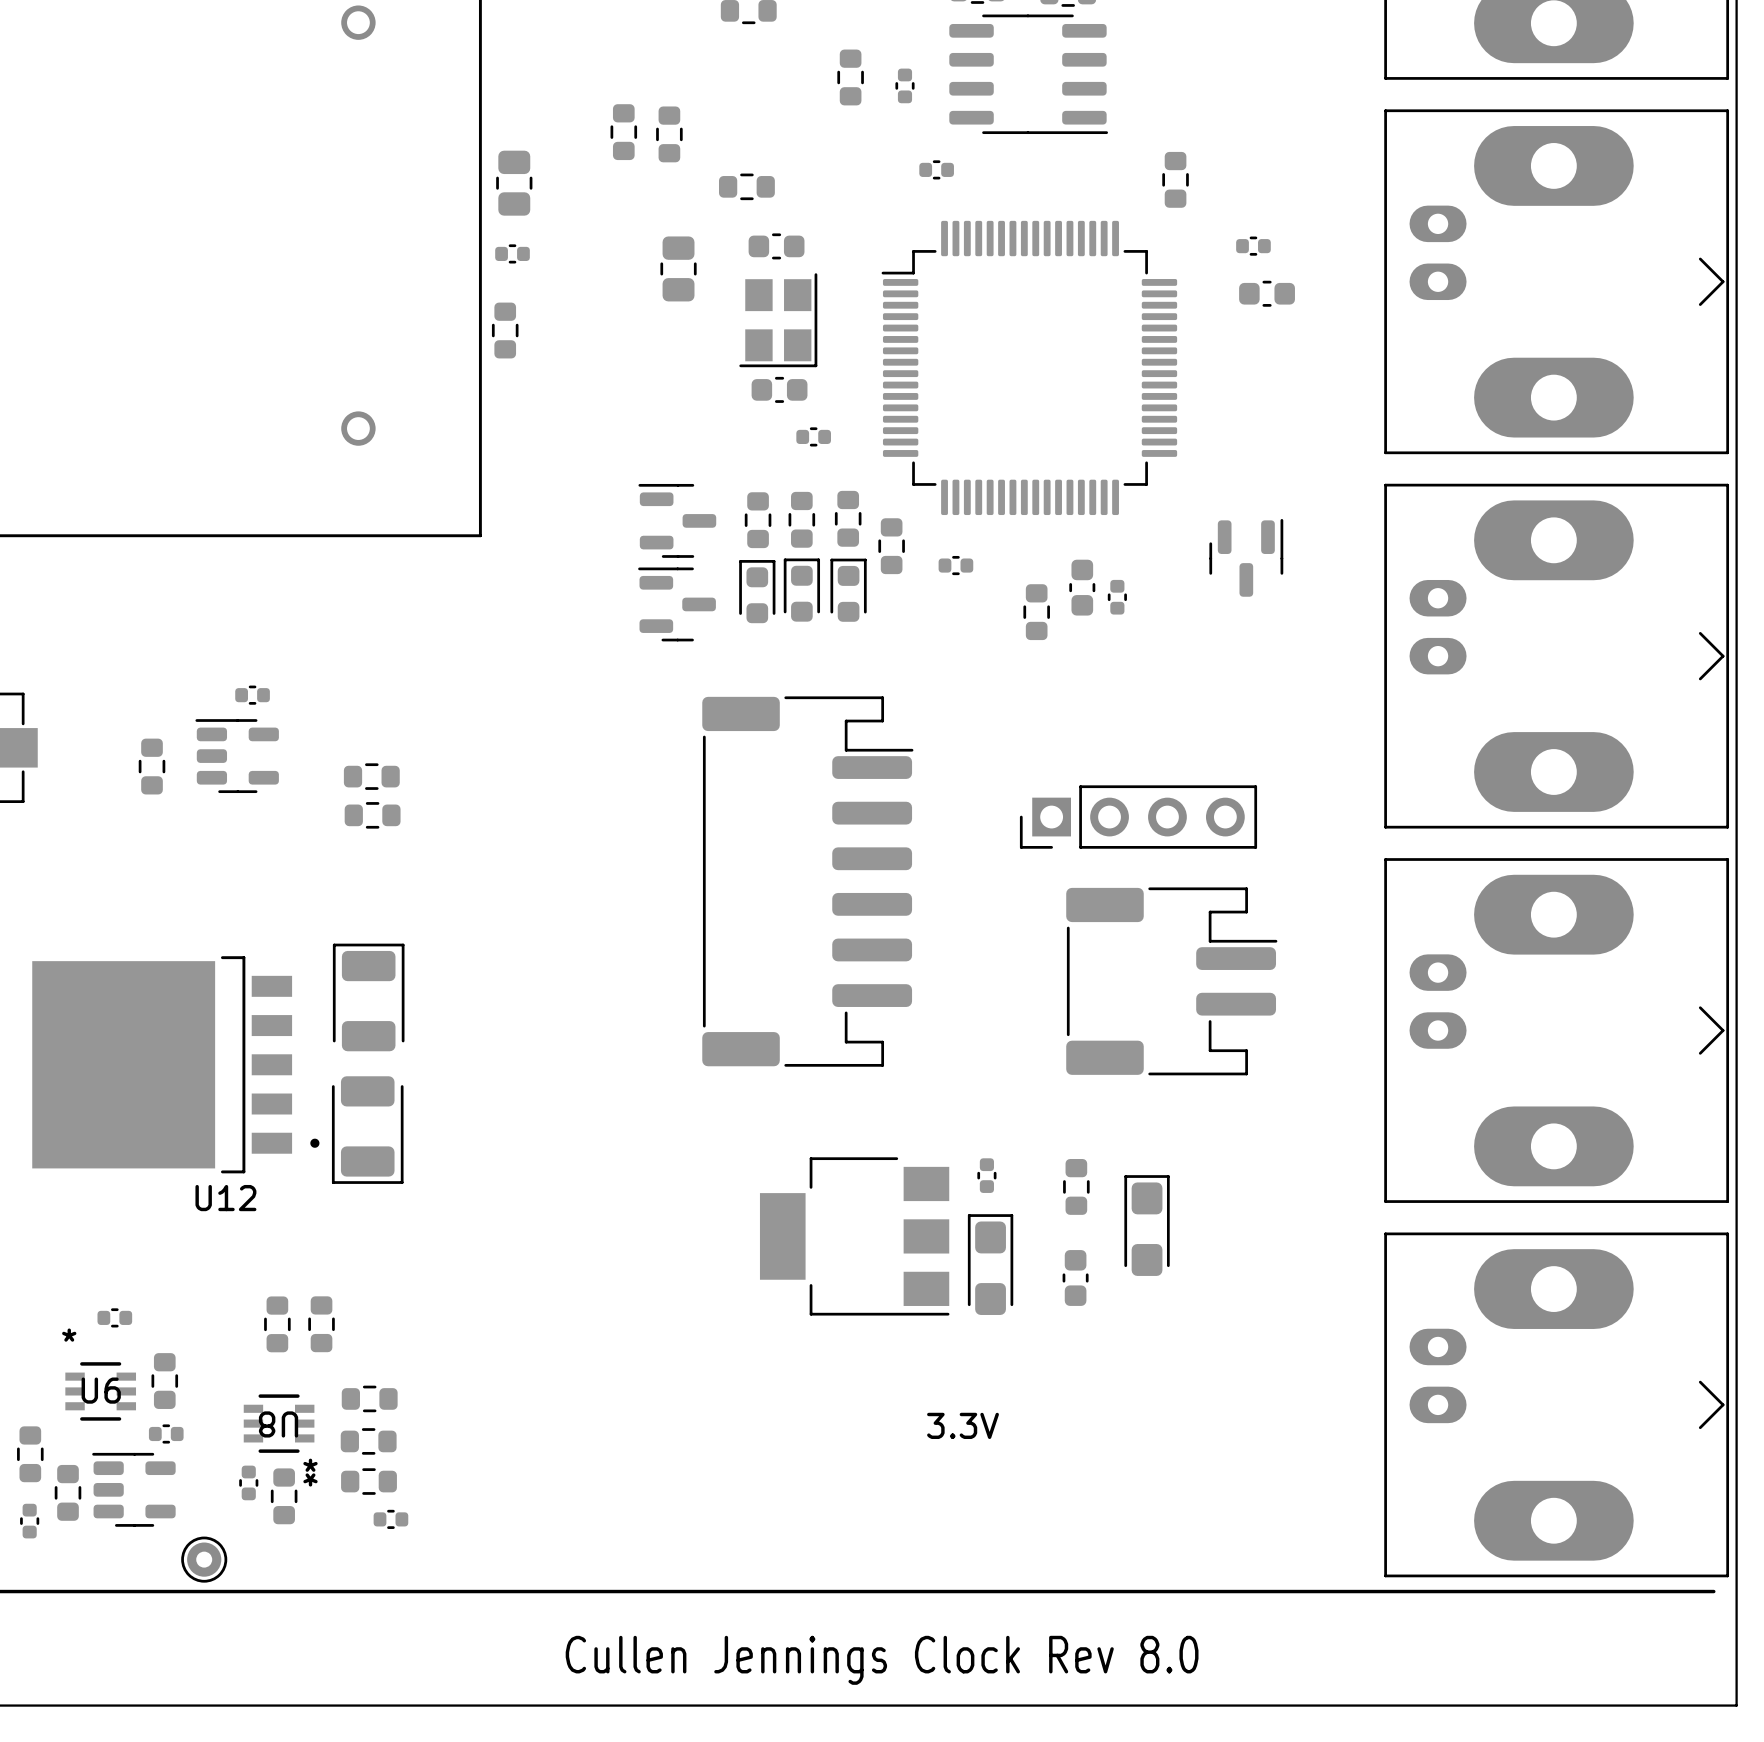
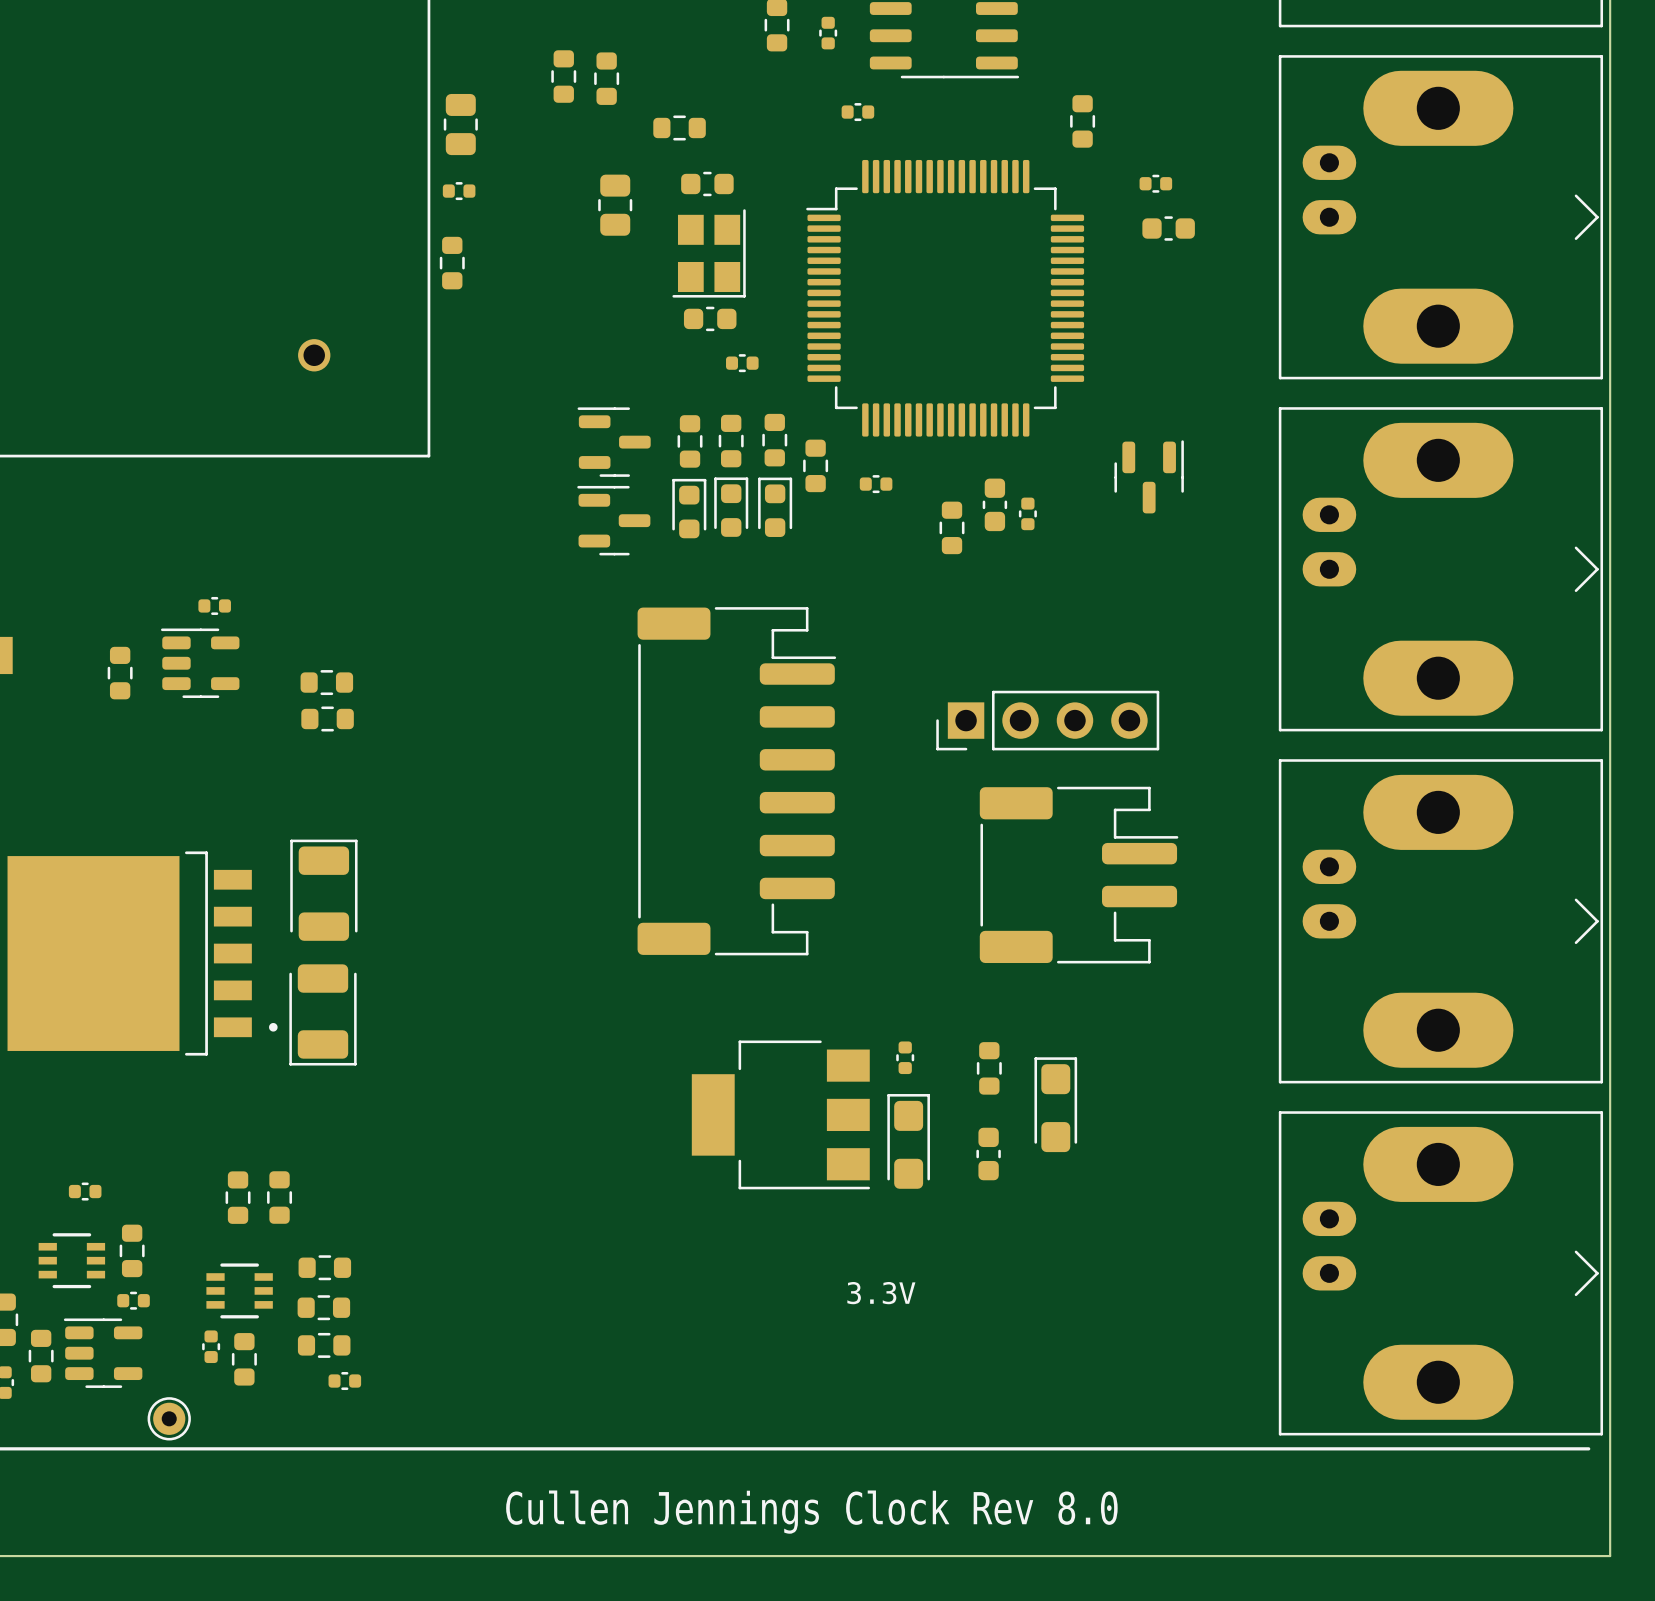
U12 name: U12 (225, 1198) -> none
U6 text: * (69, 1335) -> none
U6 name: U6 (101, 1390) -> none
U8 footprint: [243, 1394, 315, 1453] -> [206, 1263, 273, 1319]
U8 name: U8 (278, 1424) -> none

